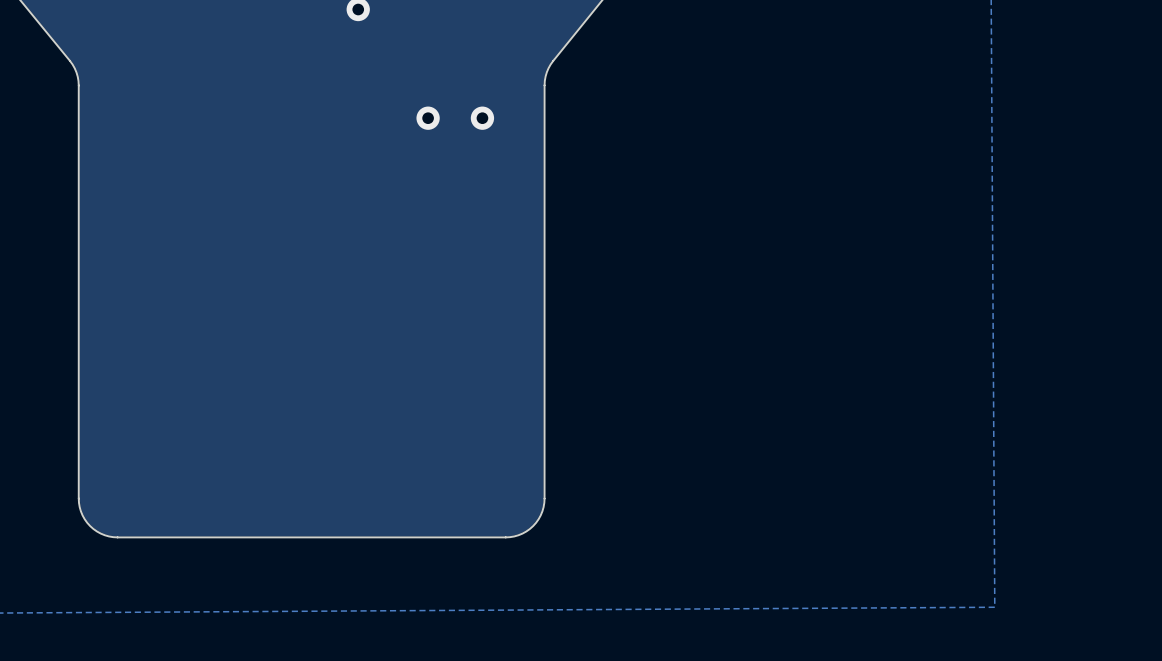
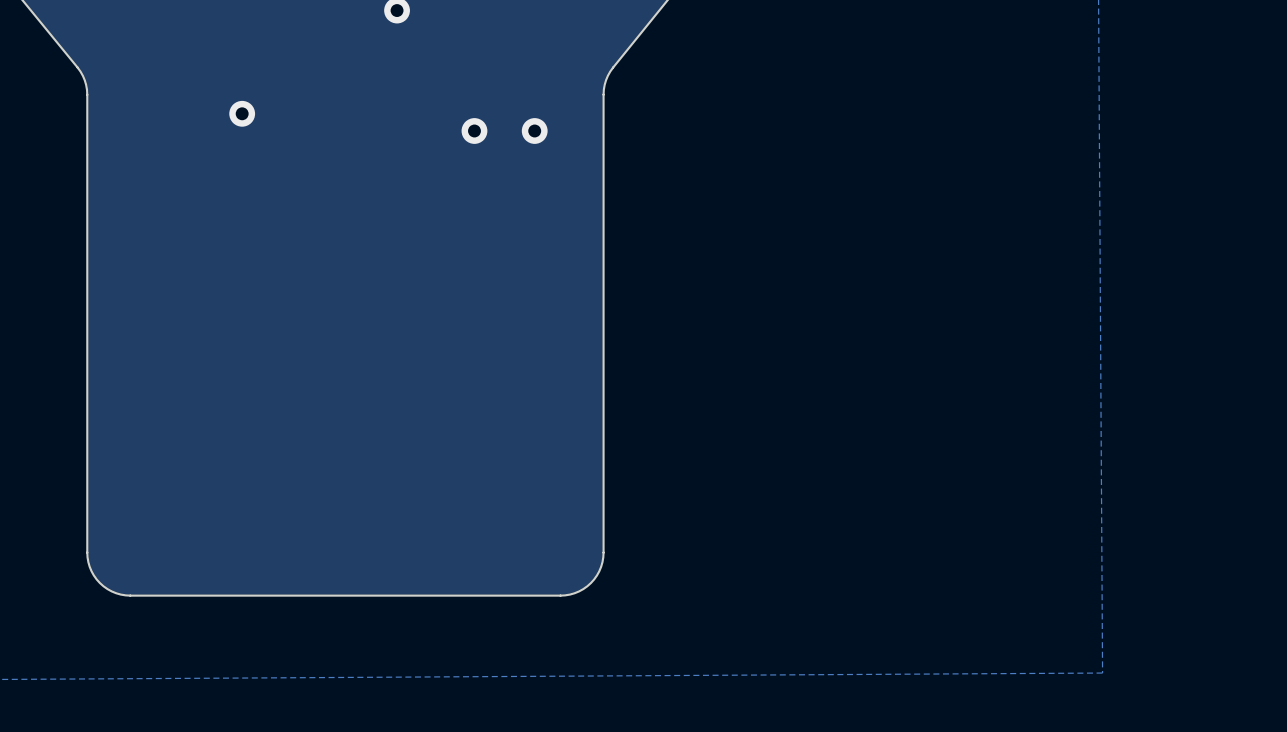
via: none -> (242, 113)

